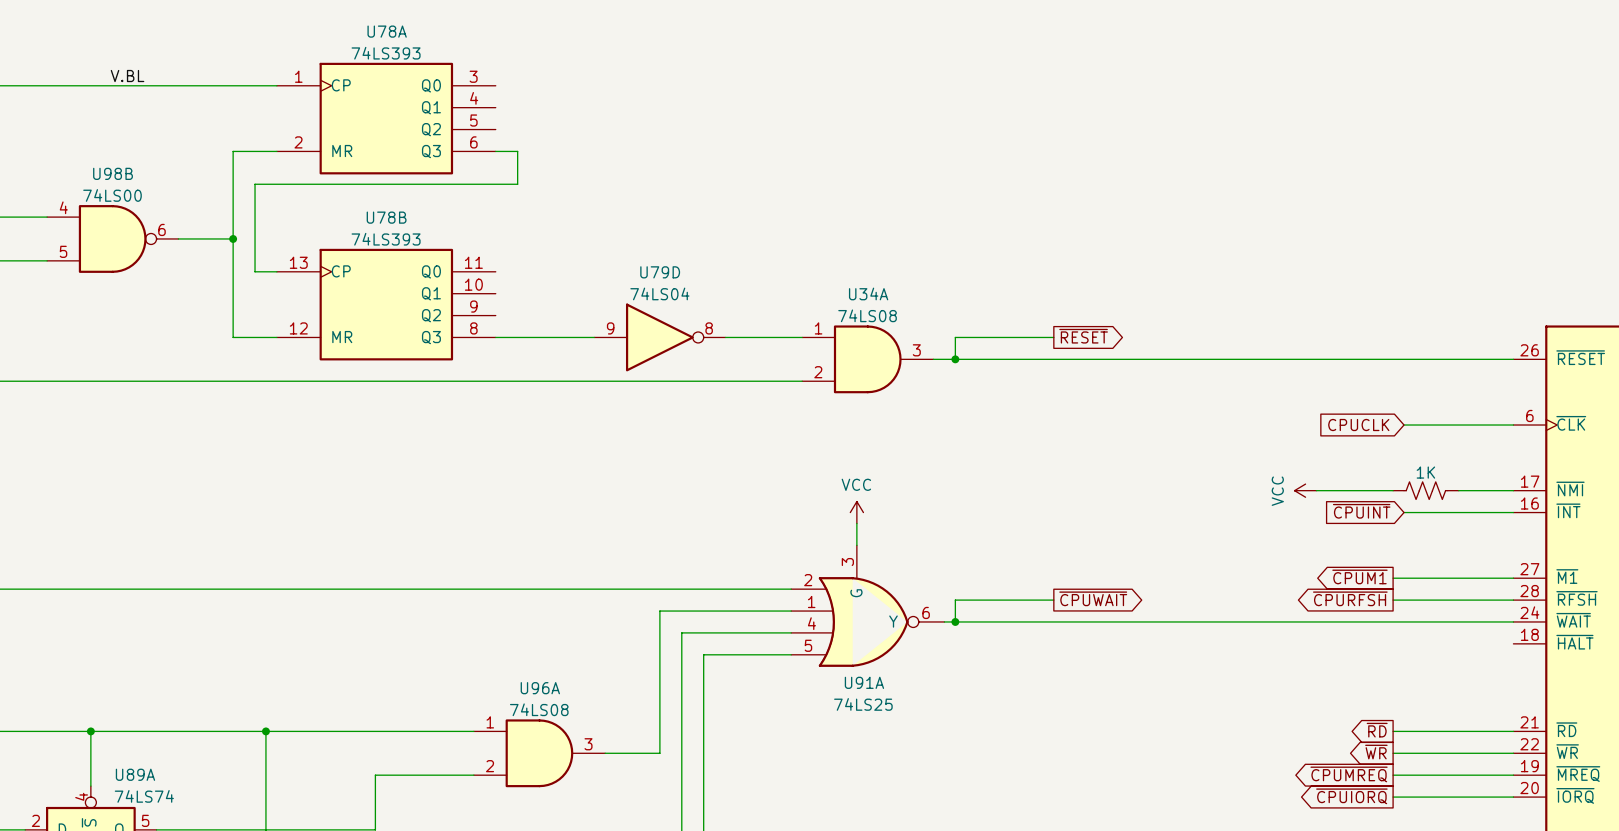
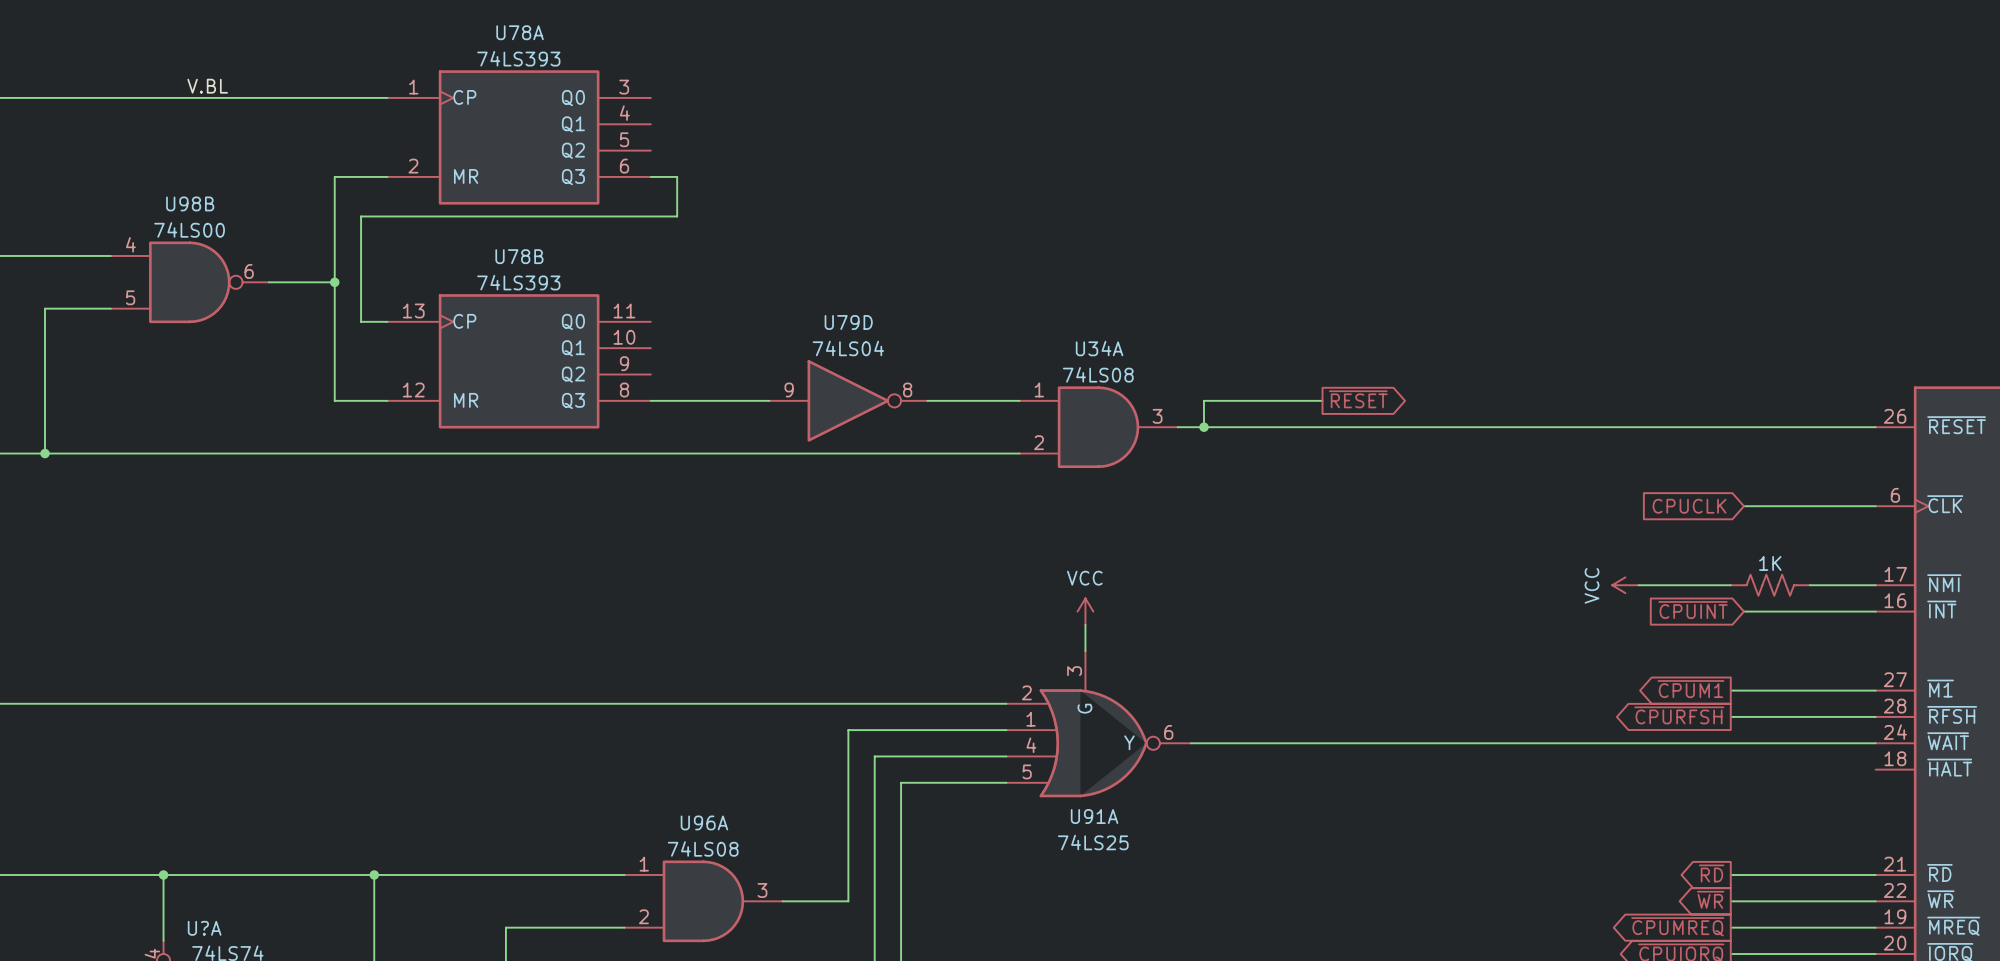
global label: ~{CPUWAIT} (1093, 598) -> none
wire: (1053, 600) (955, 600) (955, 621) -> none
junction: (955, 621) -> none
U89A name: U89A (135, 774) -> U?A (204, 928)

